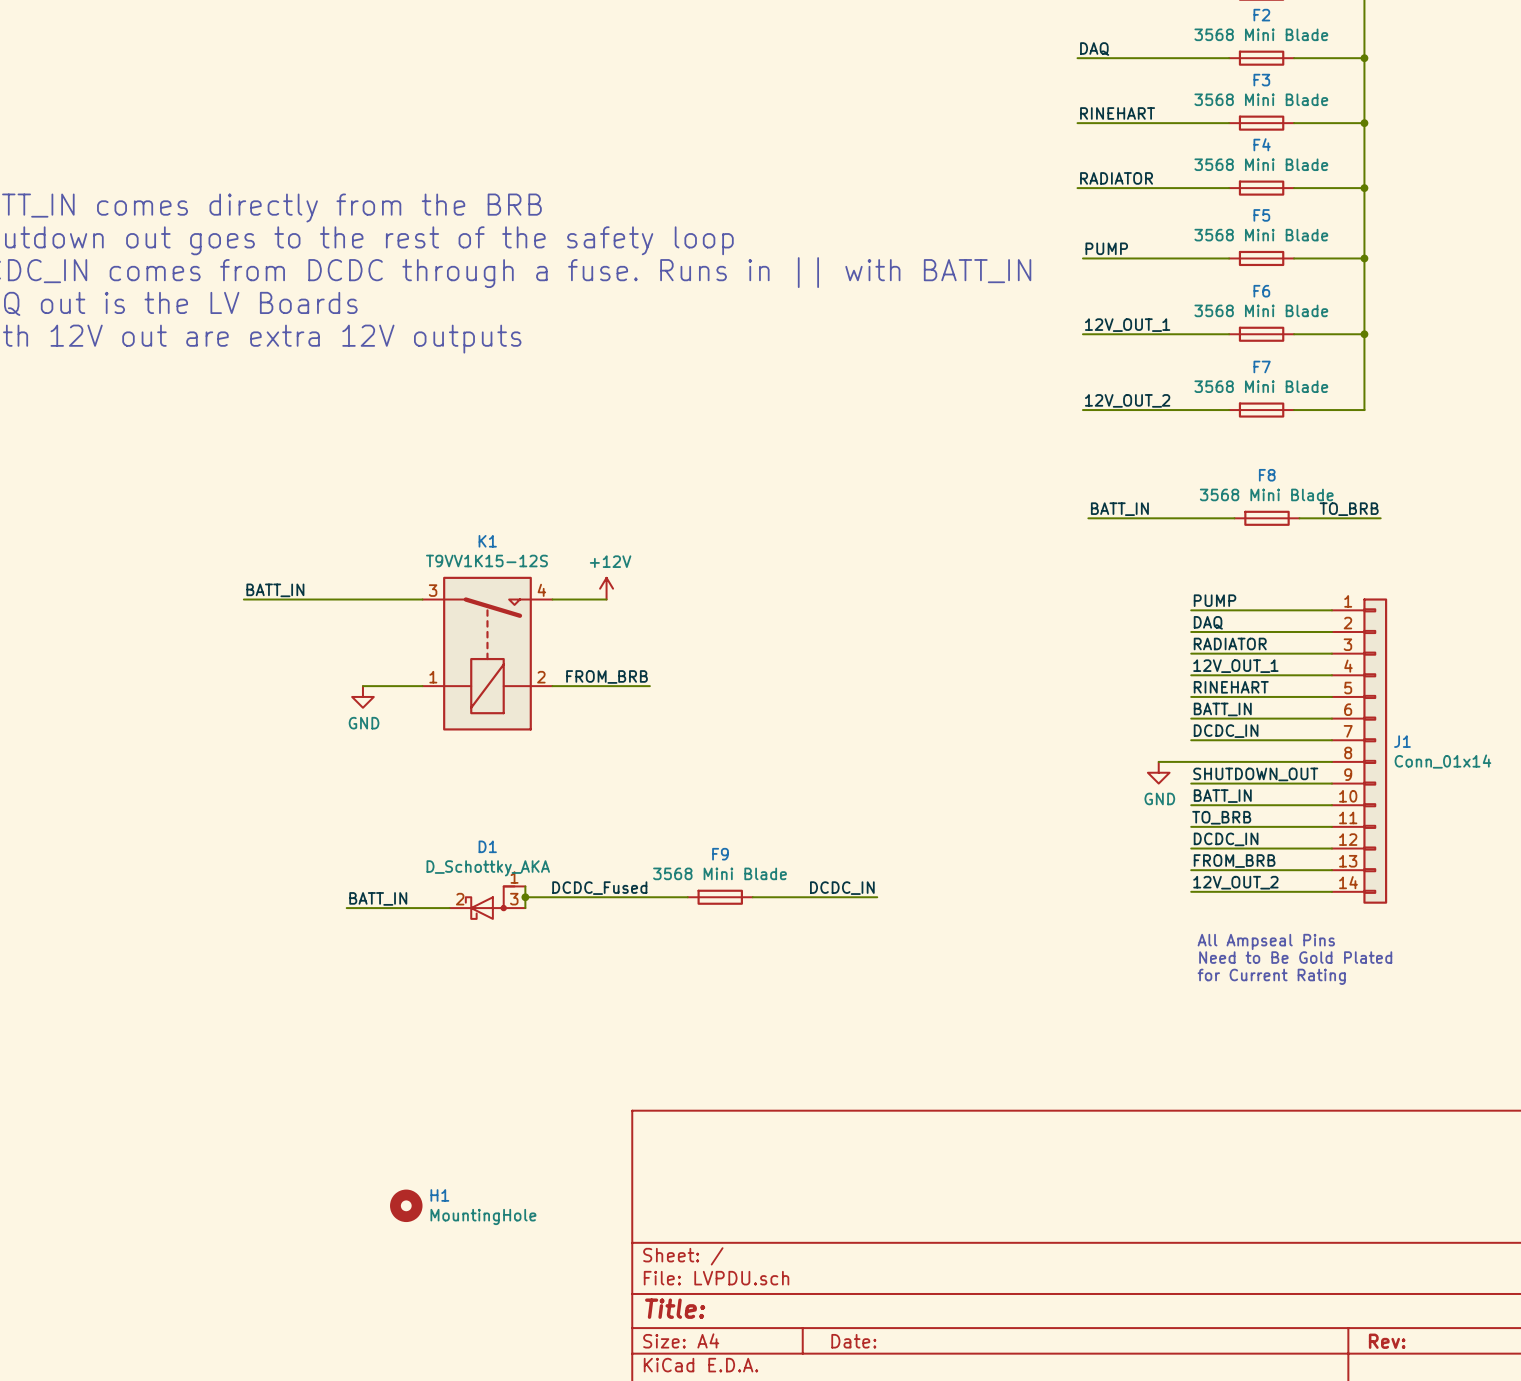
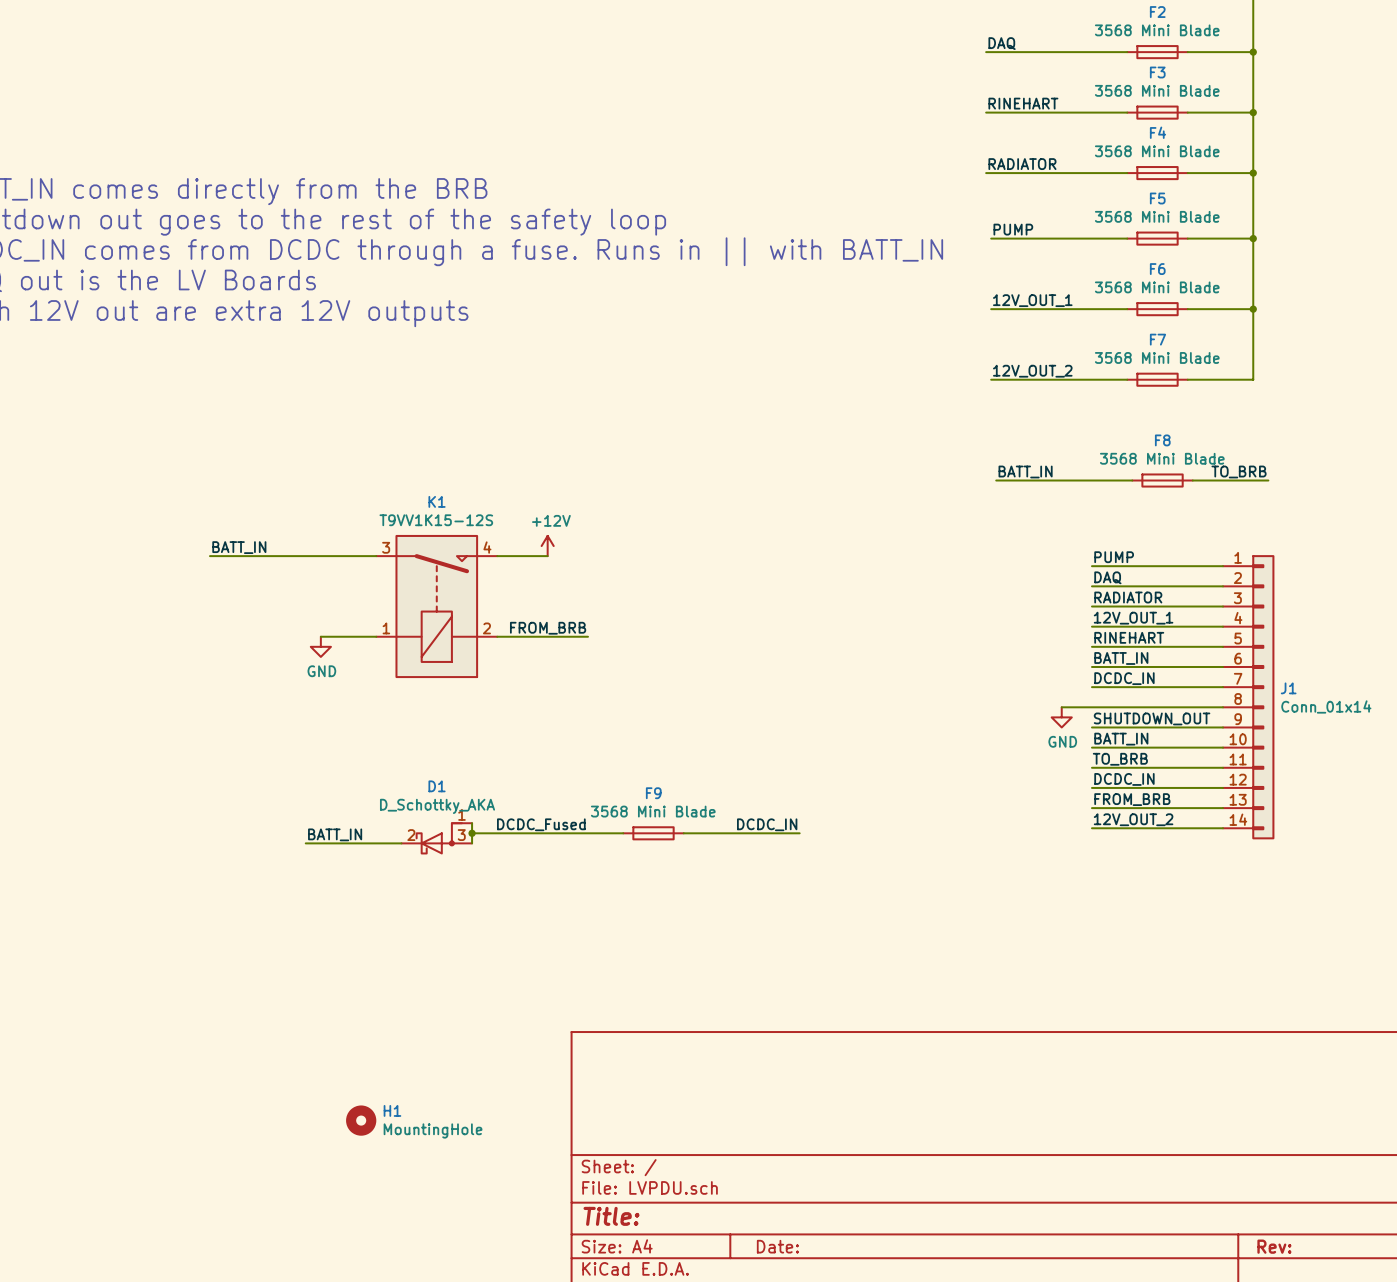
text: All Ampseal Pins (1266, 941) -> none
text: Need to Be Gold Plated (1295, 957) -> none
text: for Current Rating (1271, 976) -> none

